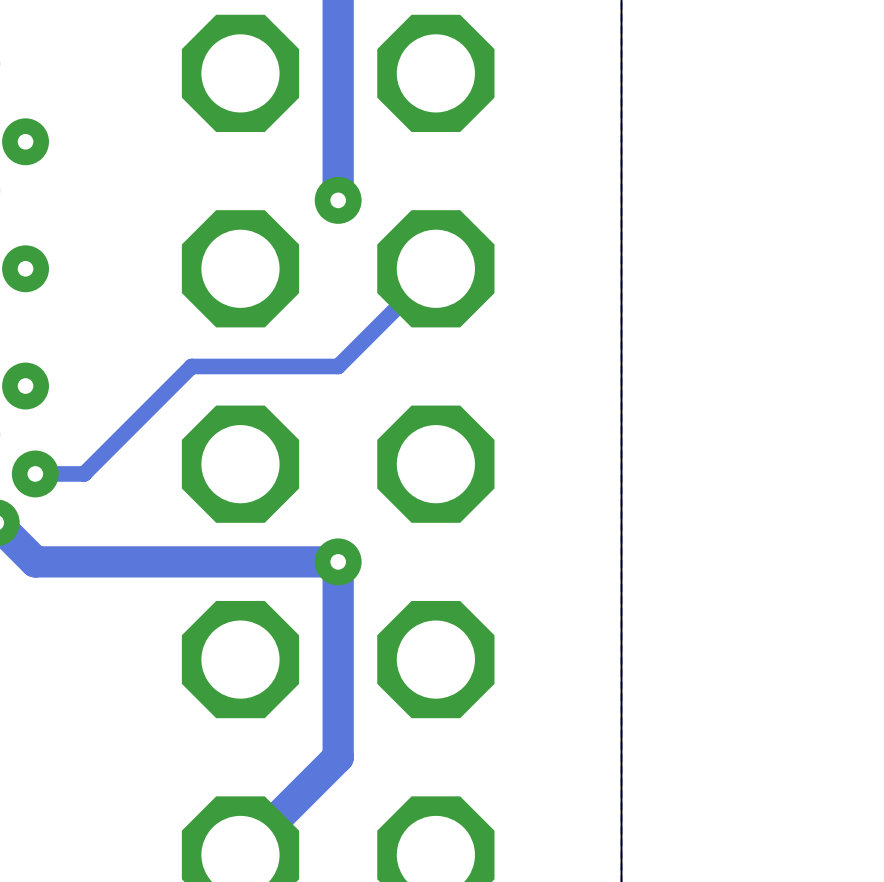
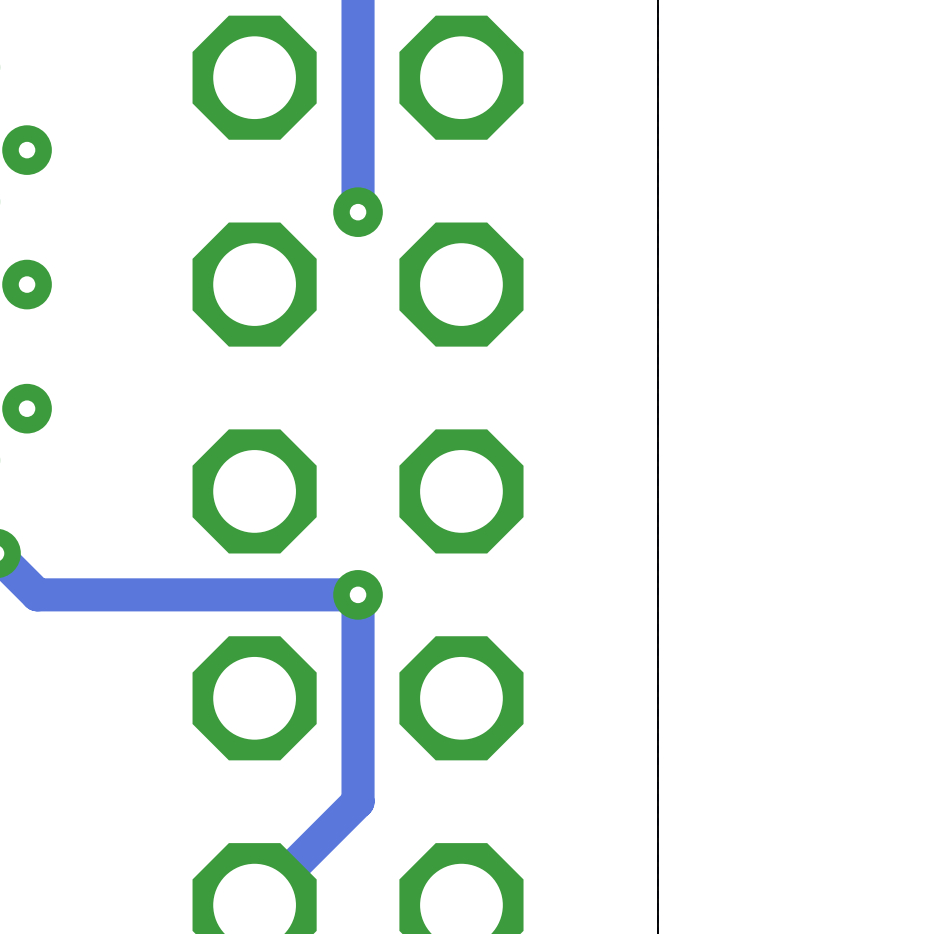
track: (435, 268) (338, 366) (191, 366) (84, 473) (35, 473) -> none
via: (35, 473) -> none

